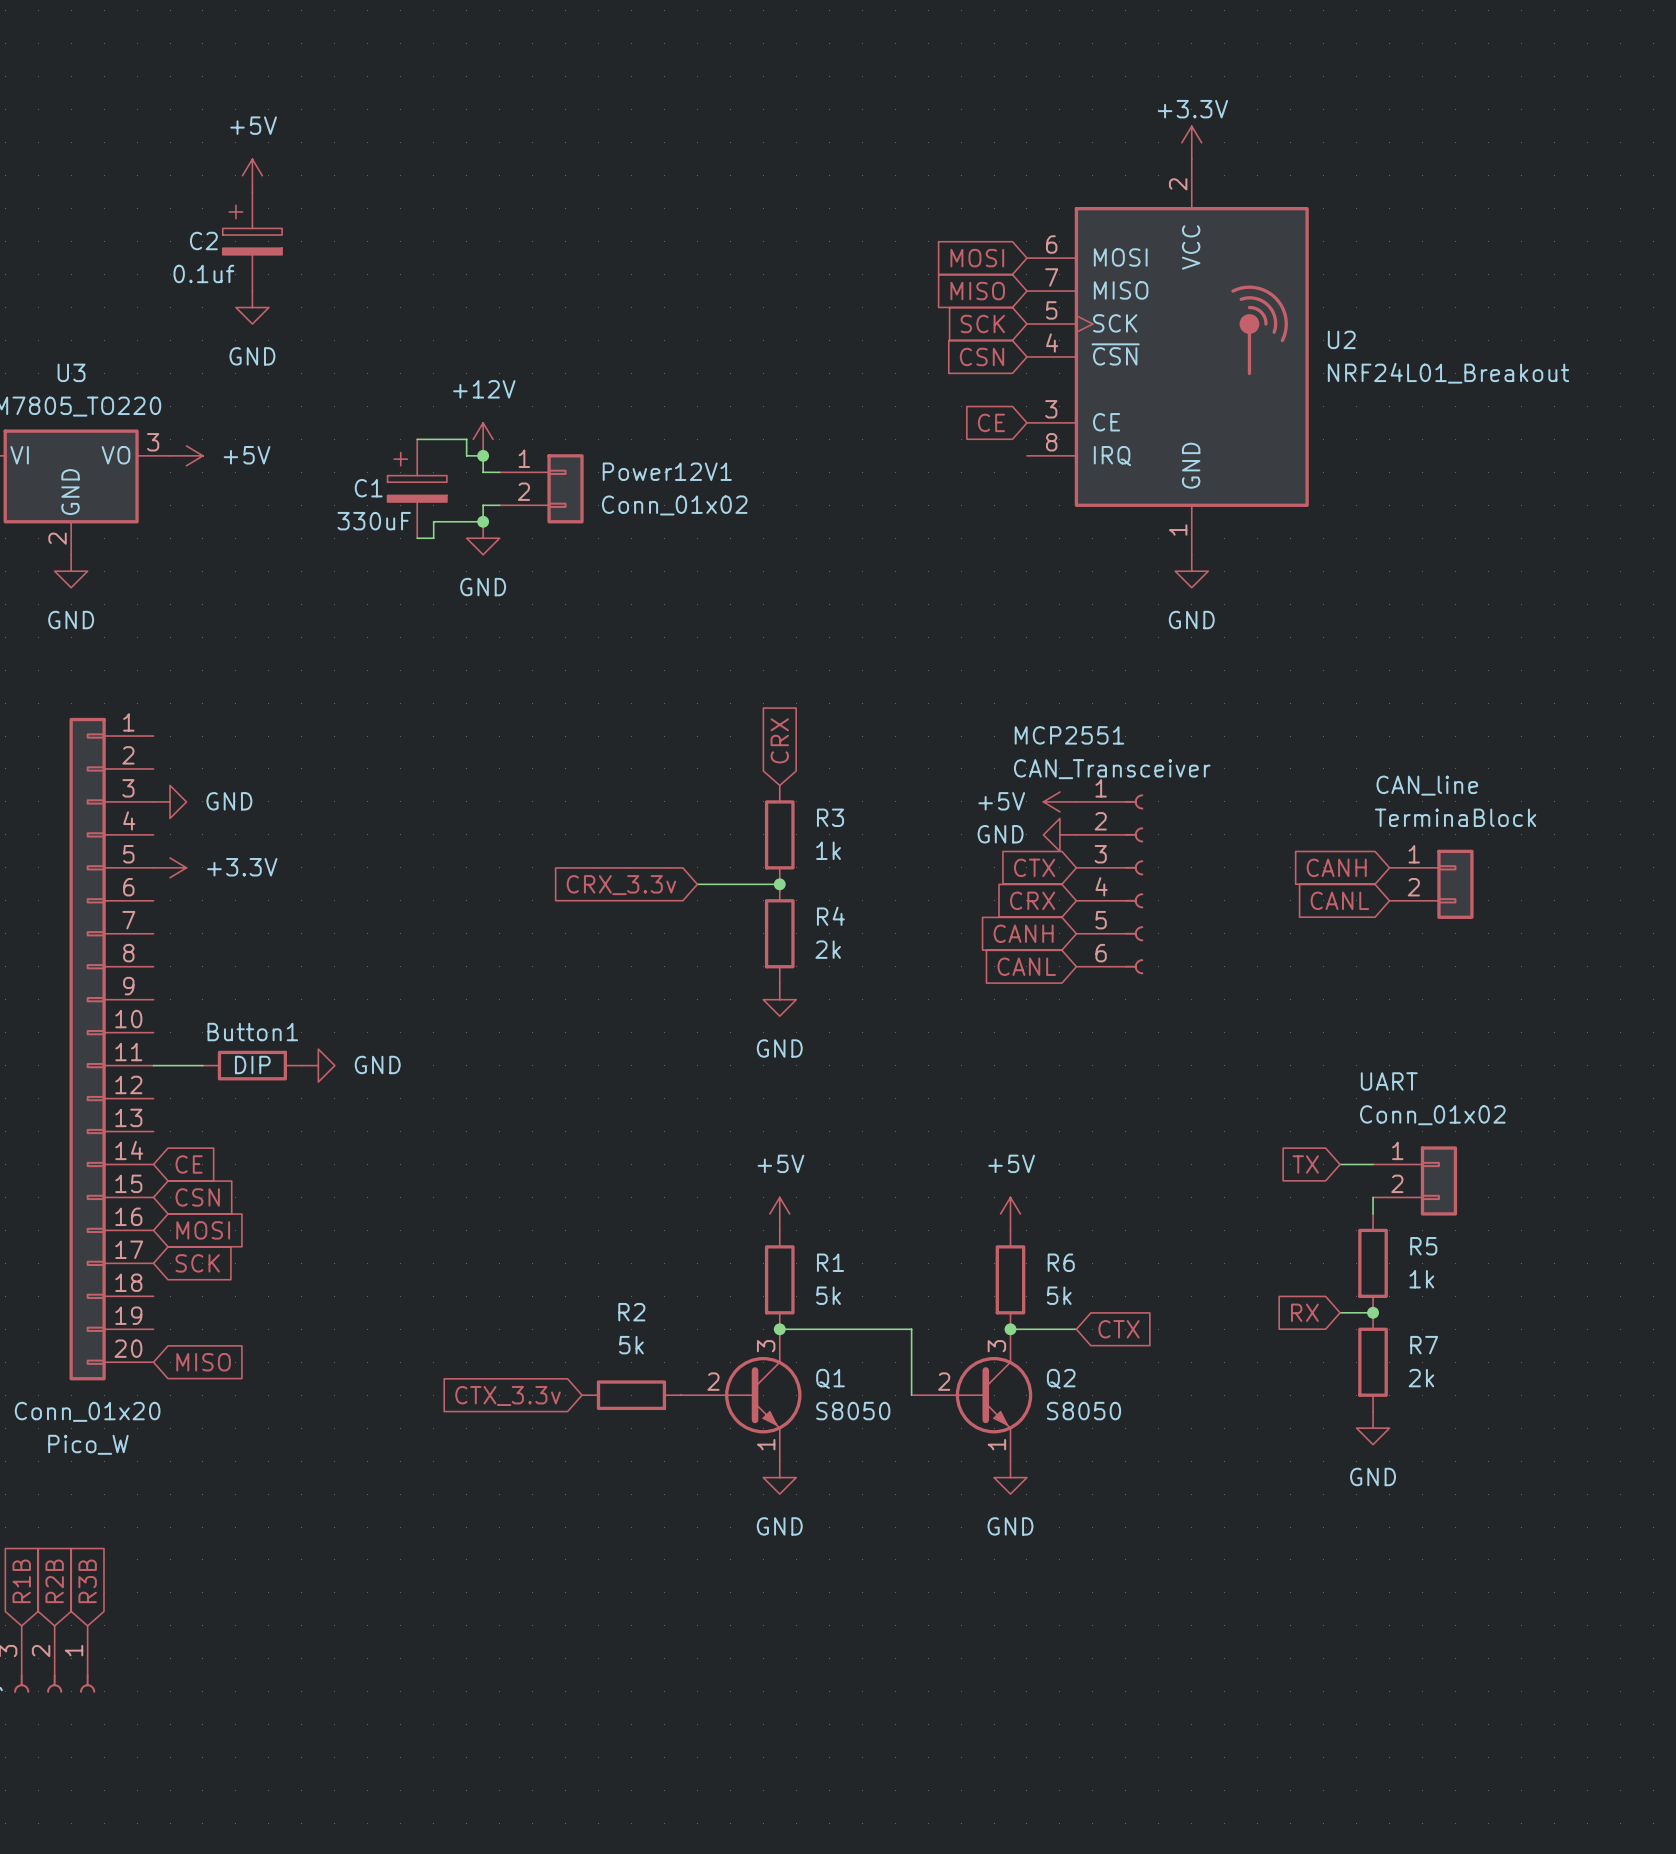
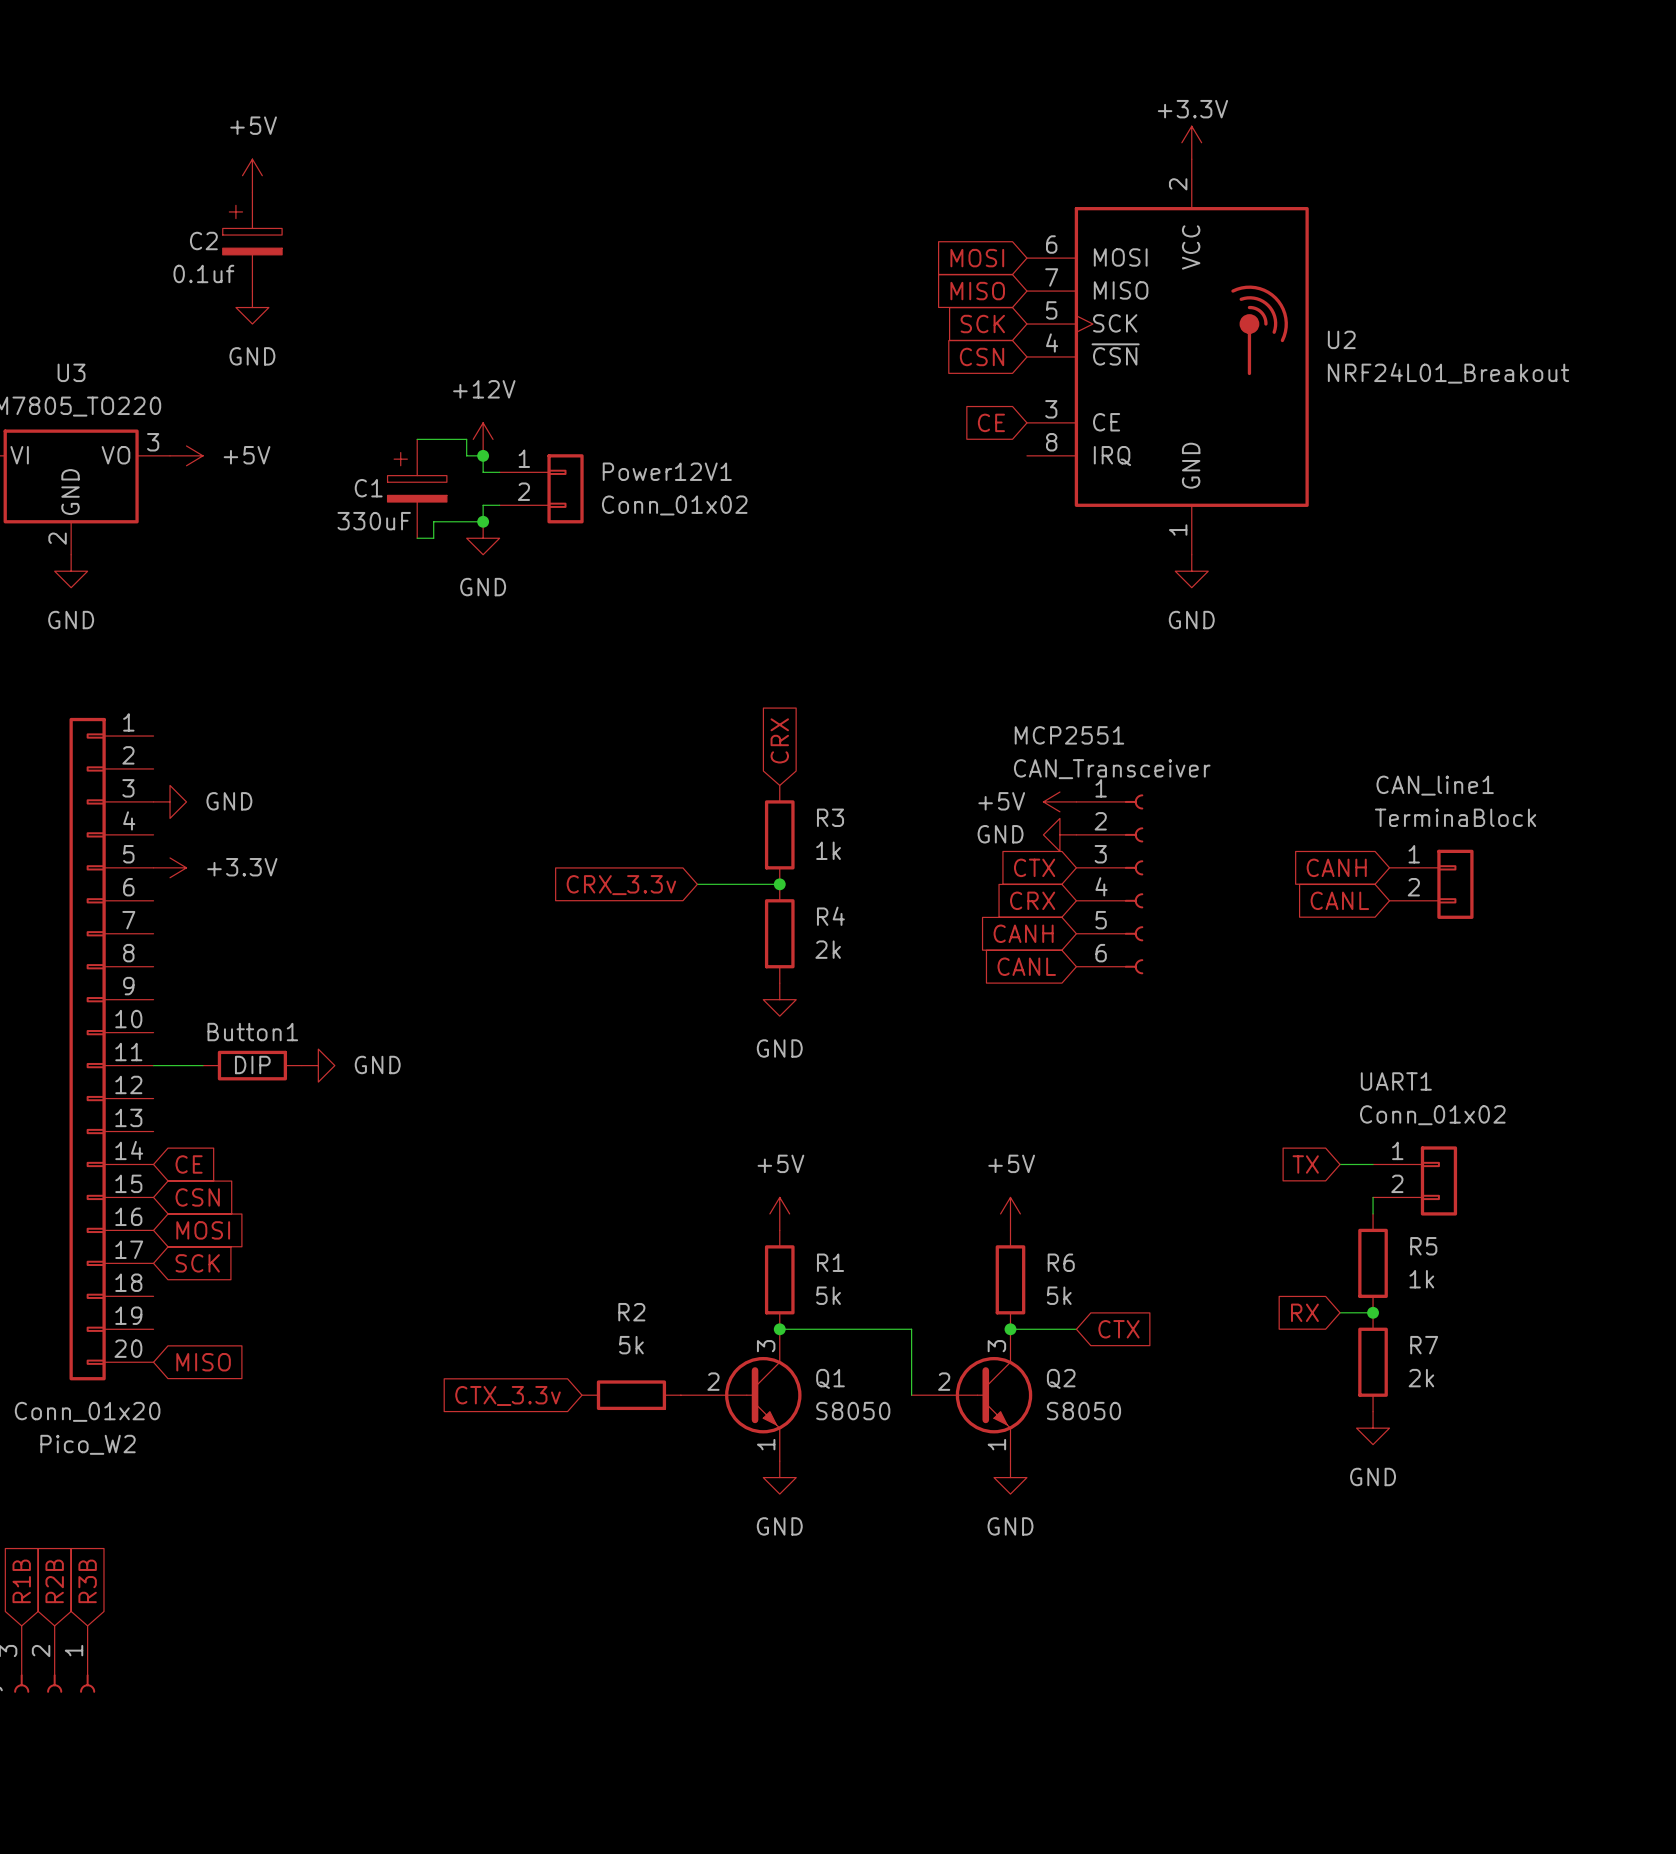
CAN_line name: CAN_line (1427, 785) -> CAN_line1 (1435, 785)
UART name: UART (1389, 1081) -> UART1 (1396, 1081)
Pico_W name: Pico_W (88, 1444) -> Pico_W2 (88, 1444)

